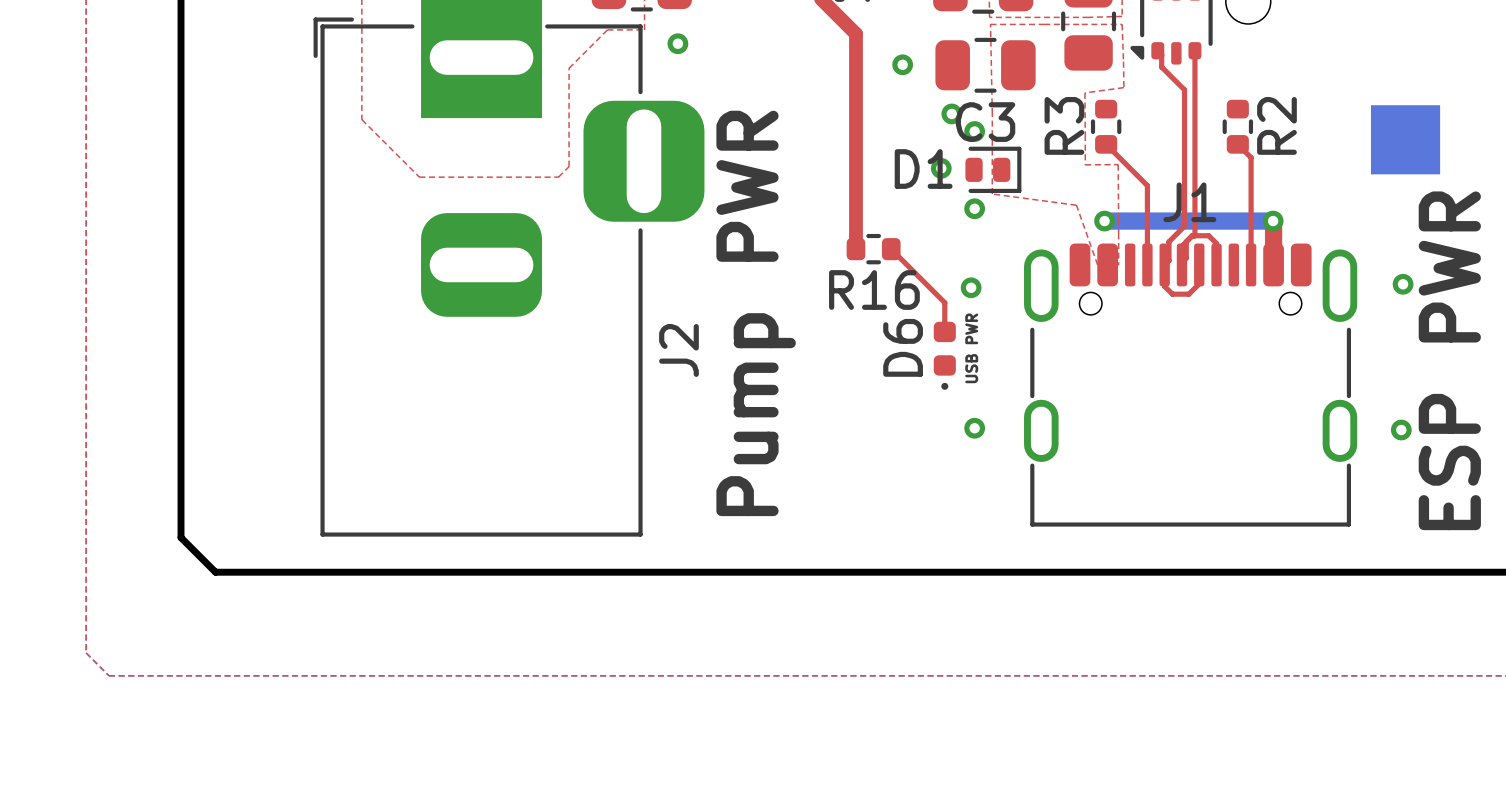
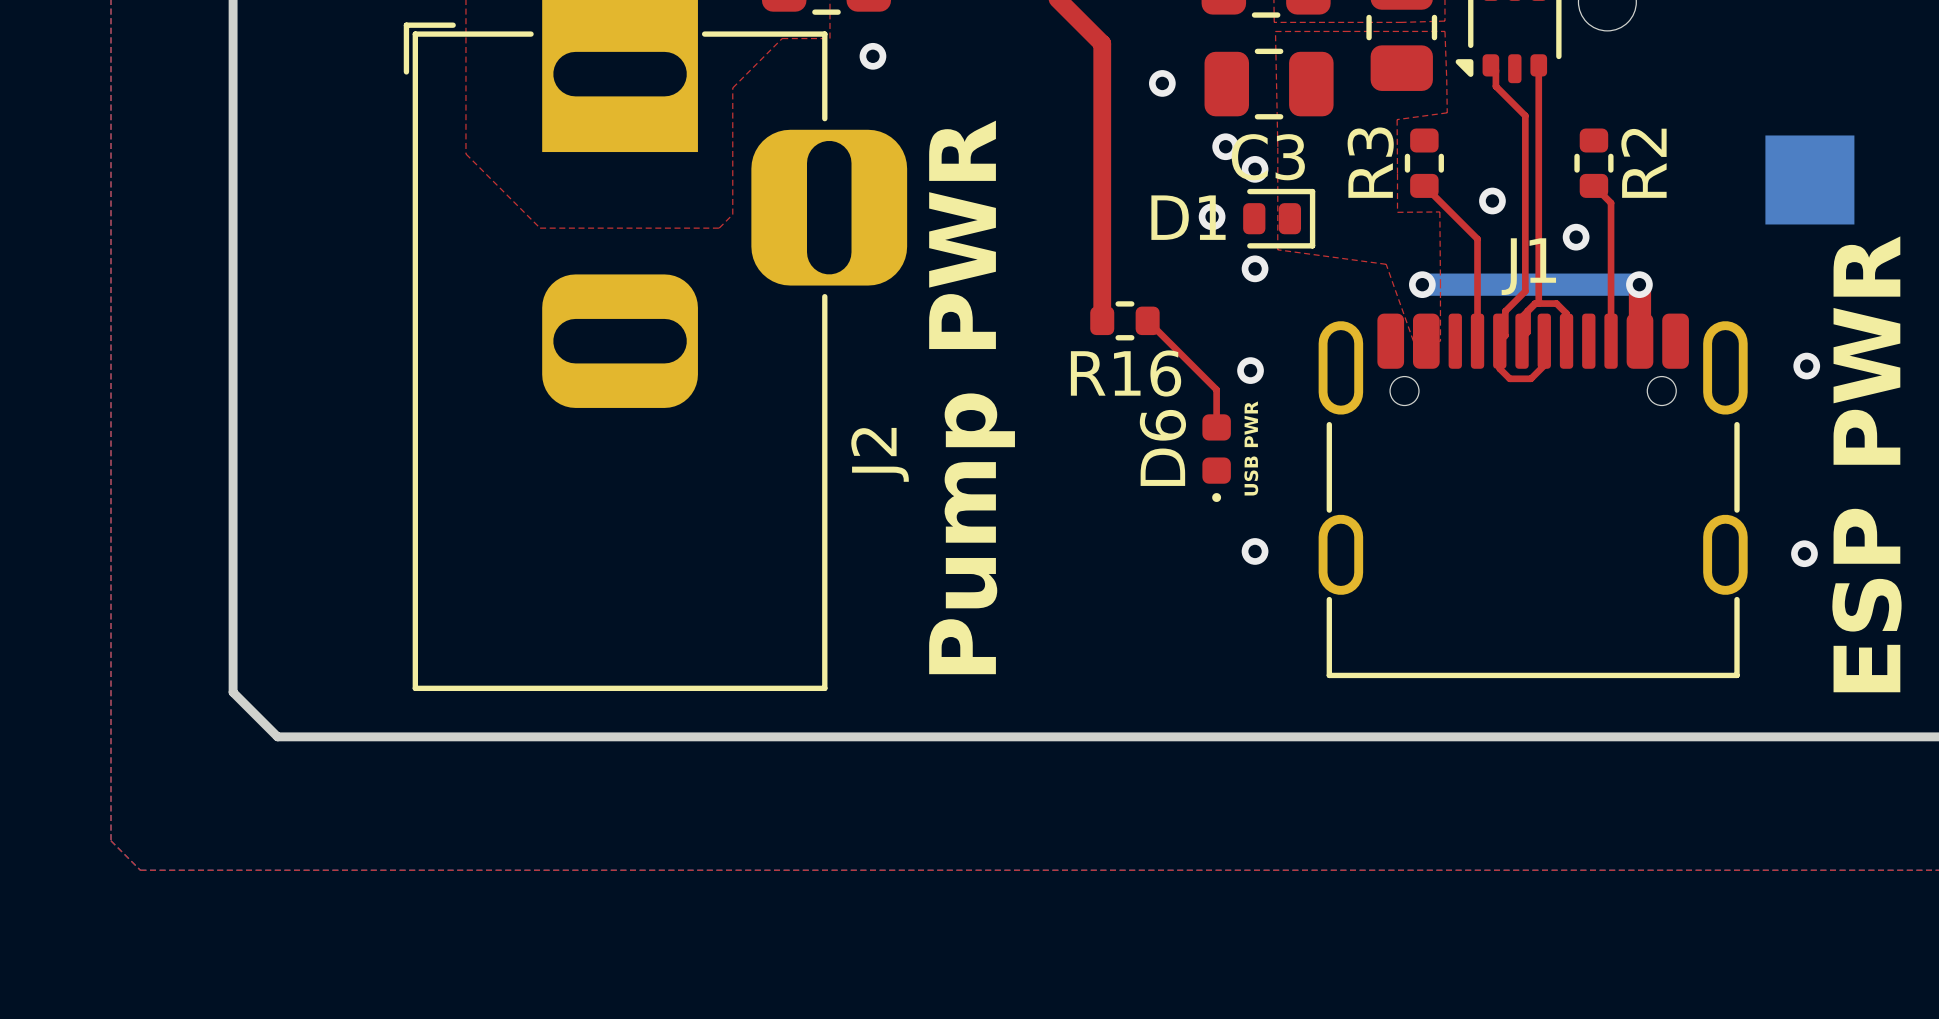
via: none -> (1492, 201)
via: none -> (1576, 237)

